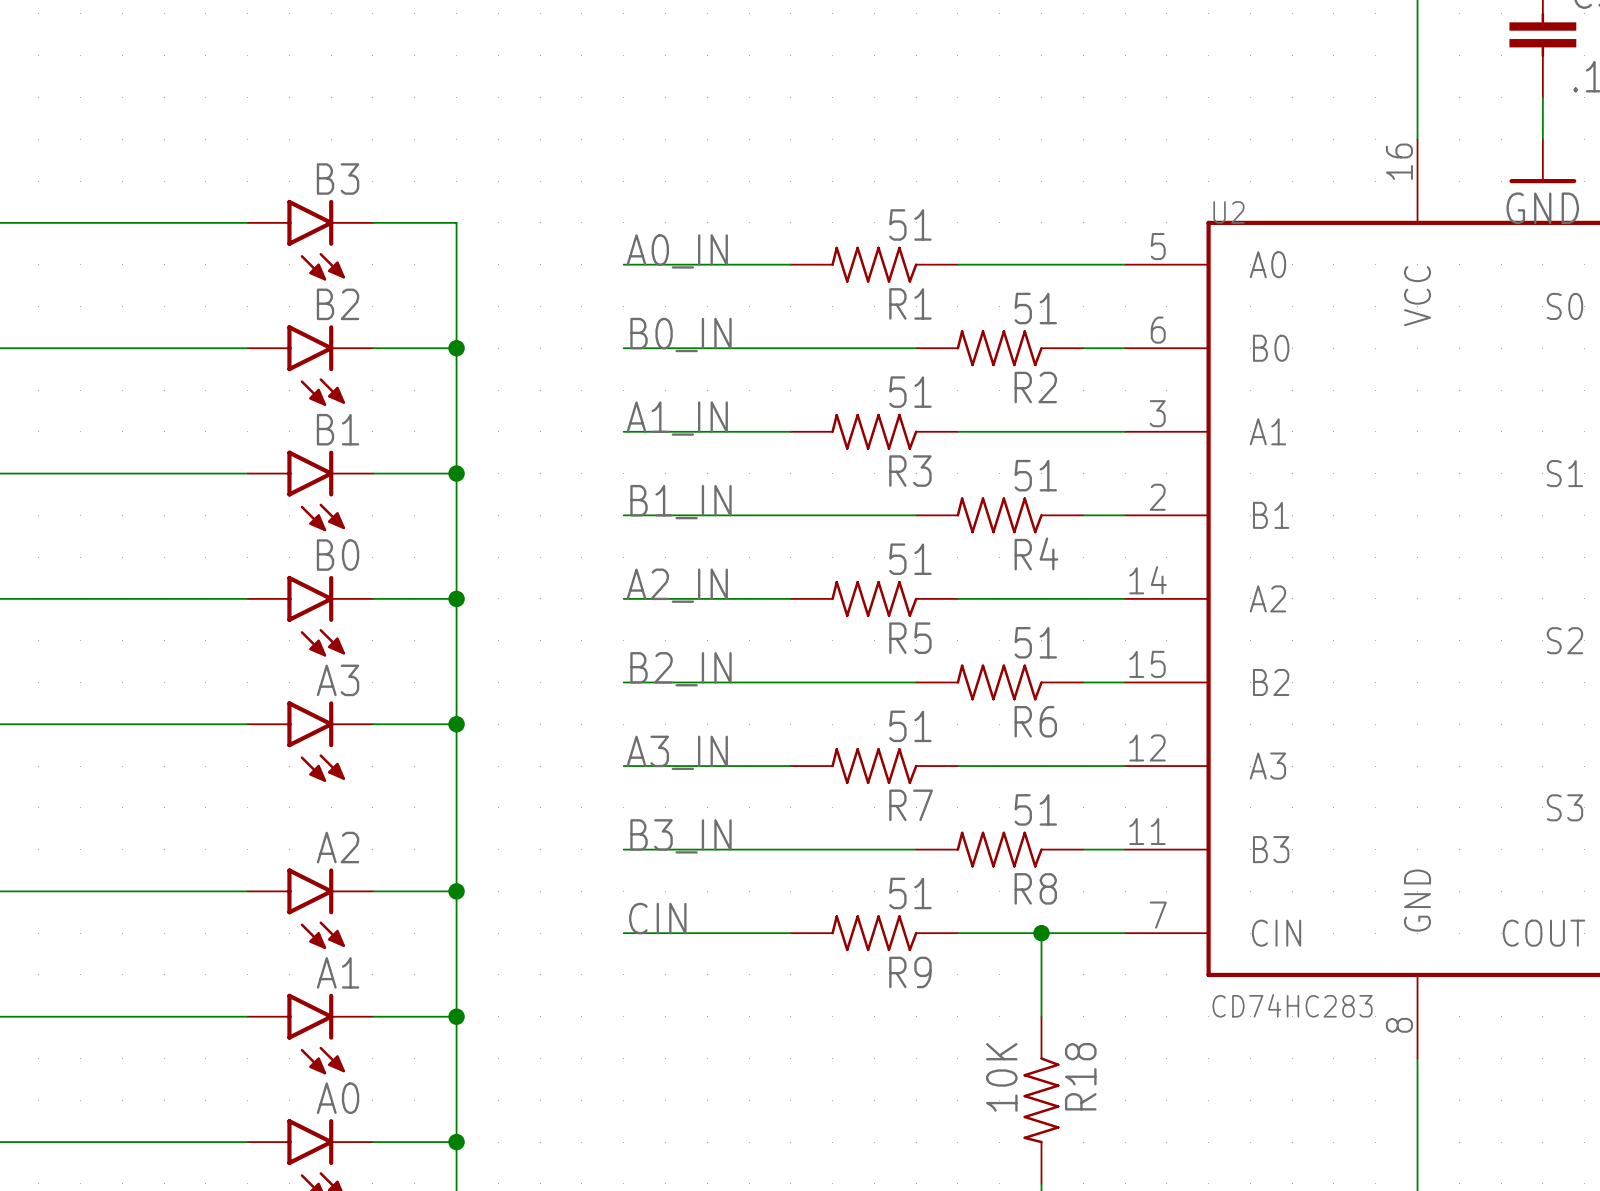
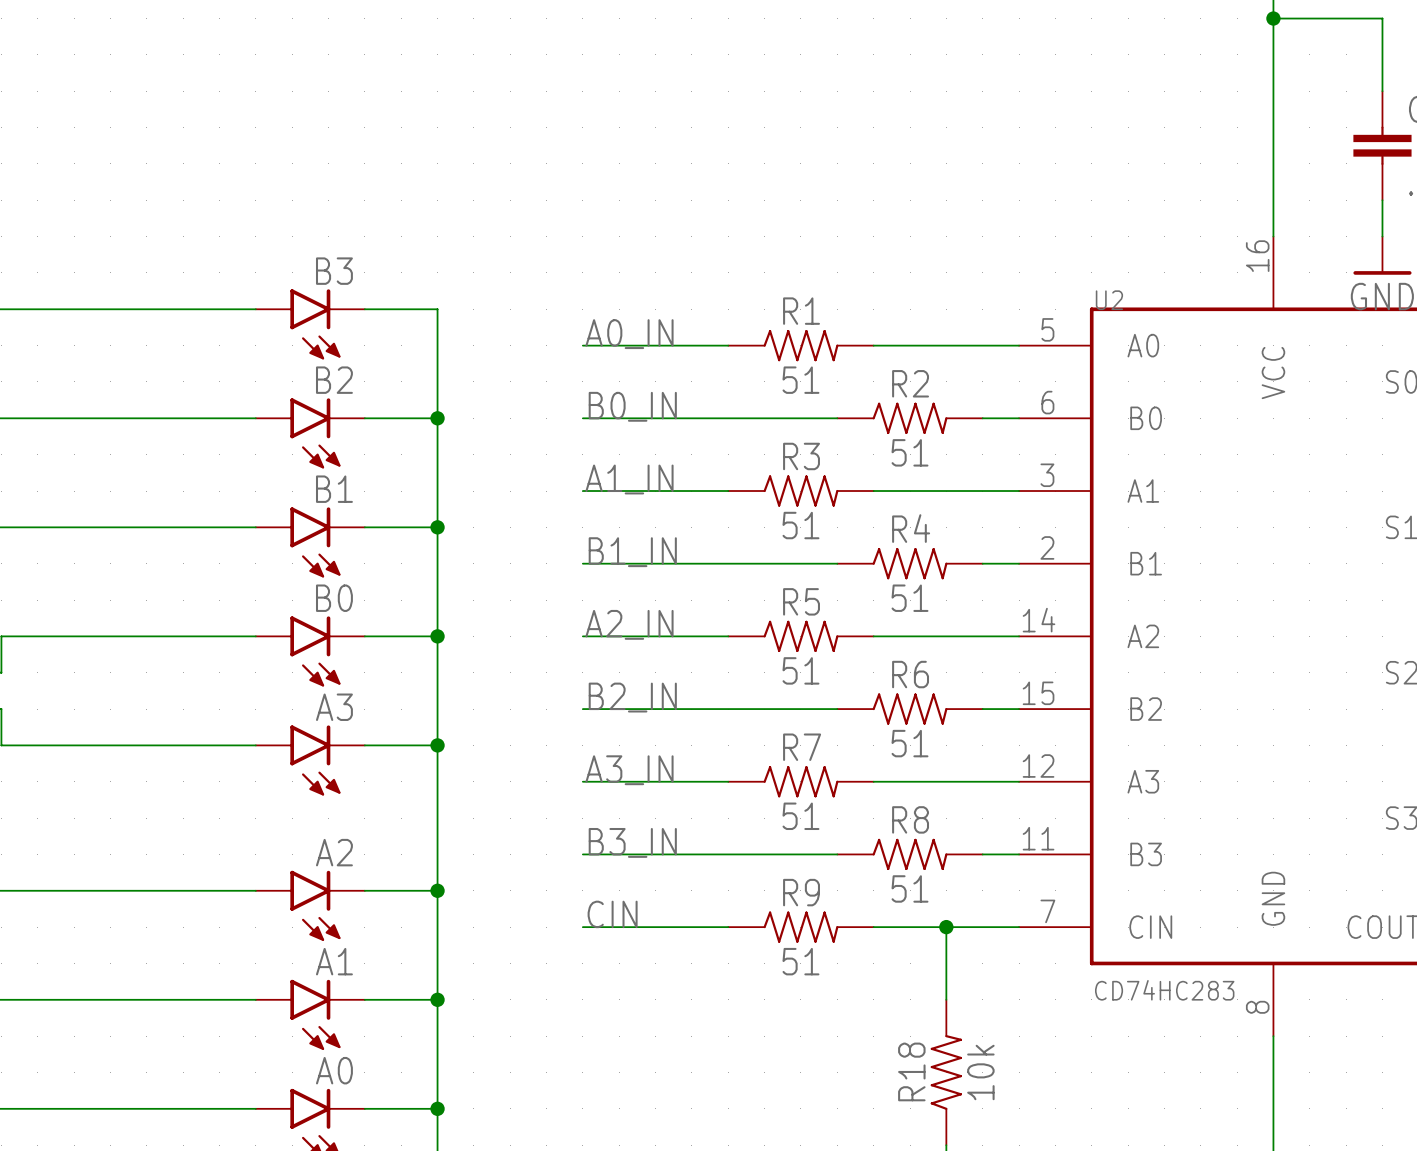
R1 rotation: 0° (874, 264) -> 180° (800, 345)
R2 rotation: 0° (999, 348) -> 180° (910, 418)
R3 rotation: 0° (874, 431) -> 180° (800, 491)
R4 rotation: 0° (999, 515) -> 180° (910, 563)
R5 rotation: 0° (874, 598) -> 180° (800, 636)
R6 rotation: 0° (999, 682) -> 180° (910, 709)
R7 rotation: 0° (874, 766) -> 180° (800, 781)
R8 rotation: 0° (999, 849) -> 180° (910, 854)
R9 rotation: 0° (874, 933) -> 180° (800, 927)
R18 value: 10K (1001, 1077) -> 10k (980, 1072)
R18 rotation: 0° (1041, 1100) -> 180° (946, 1072)

